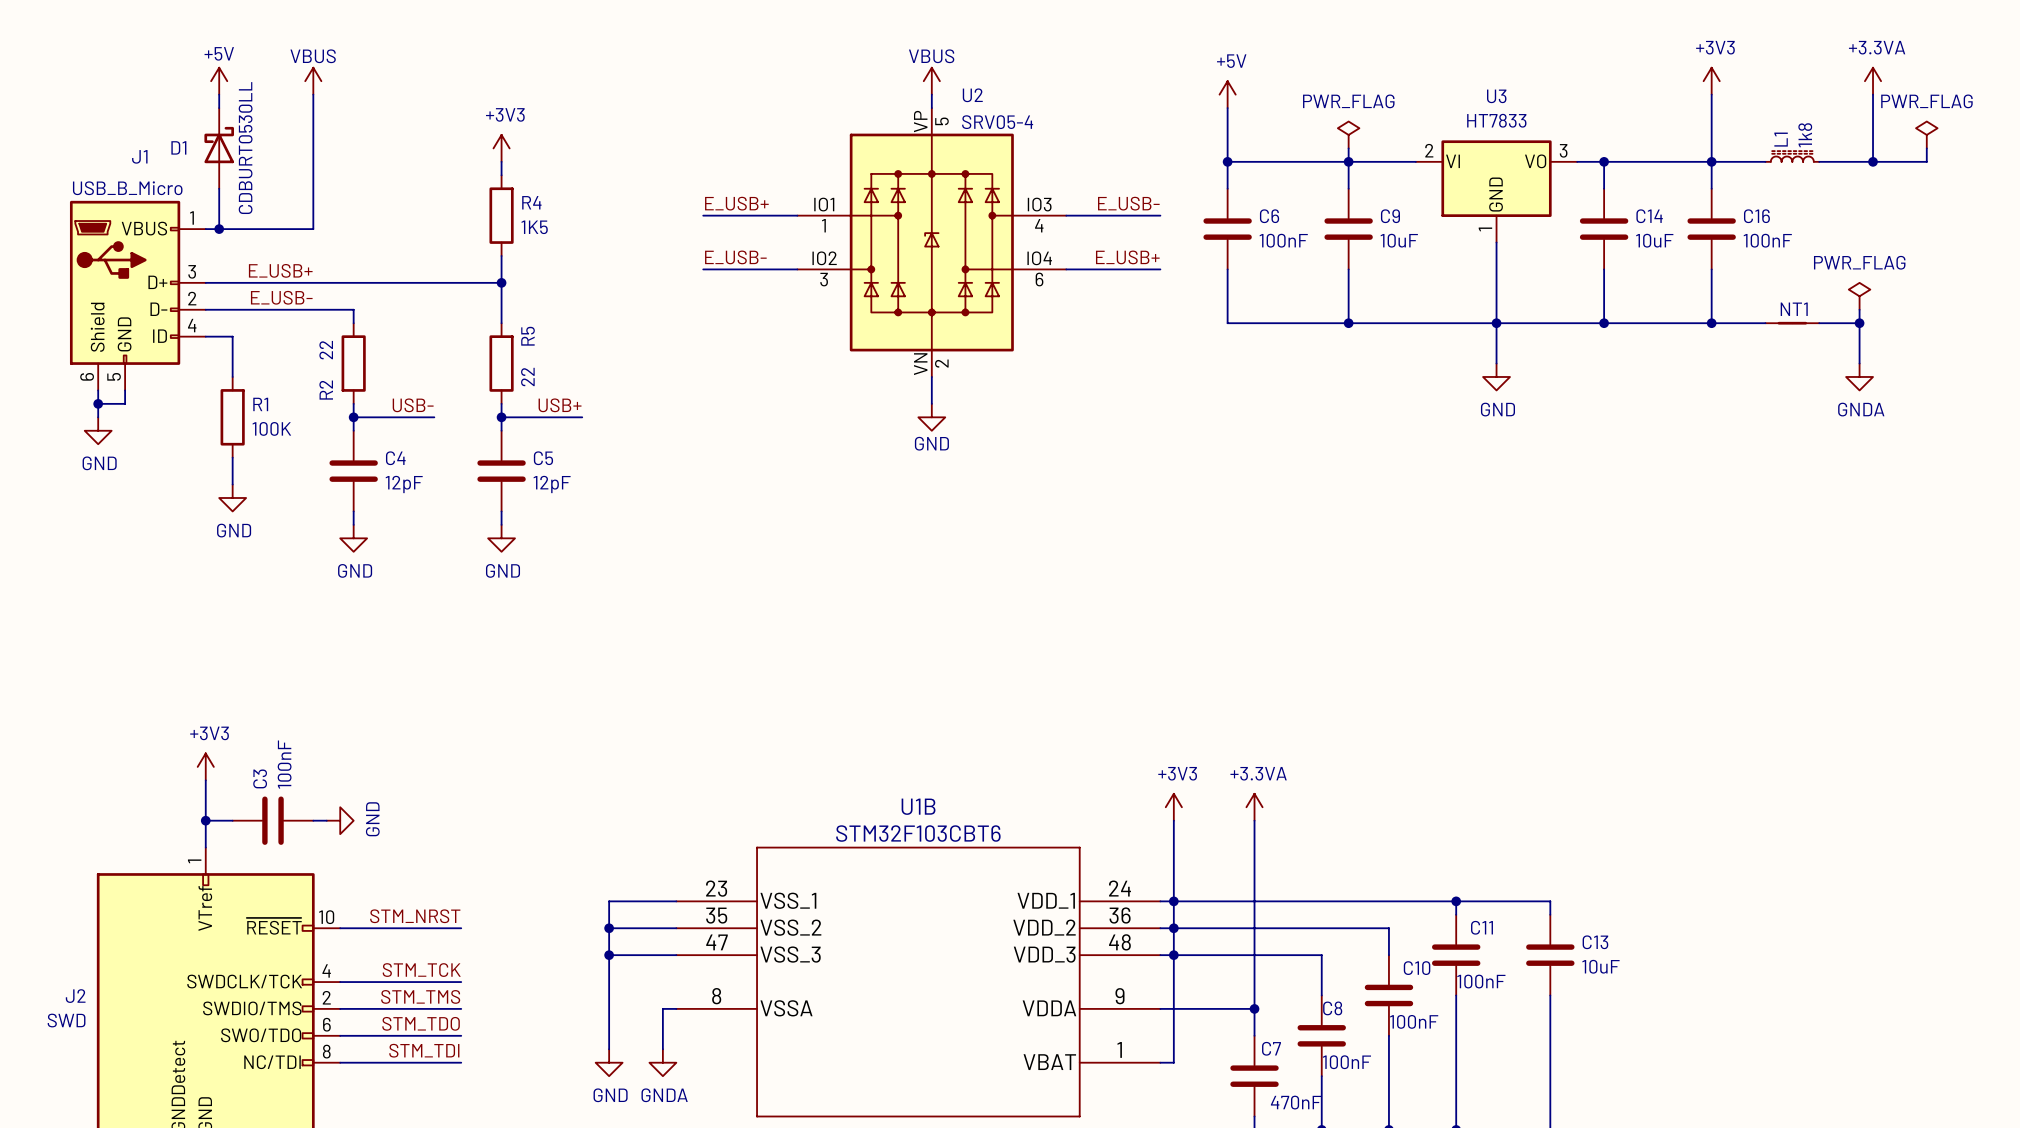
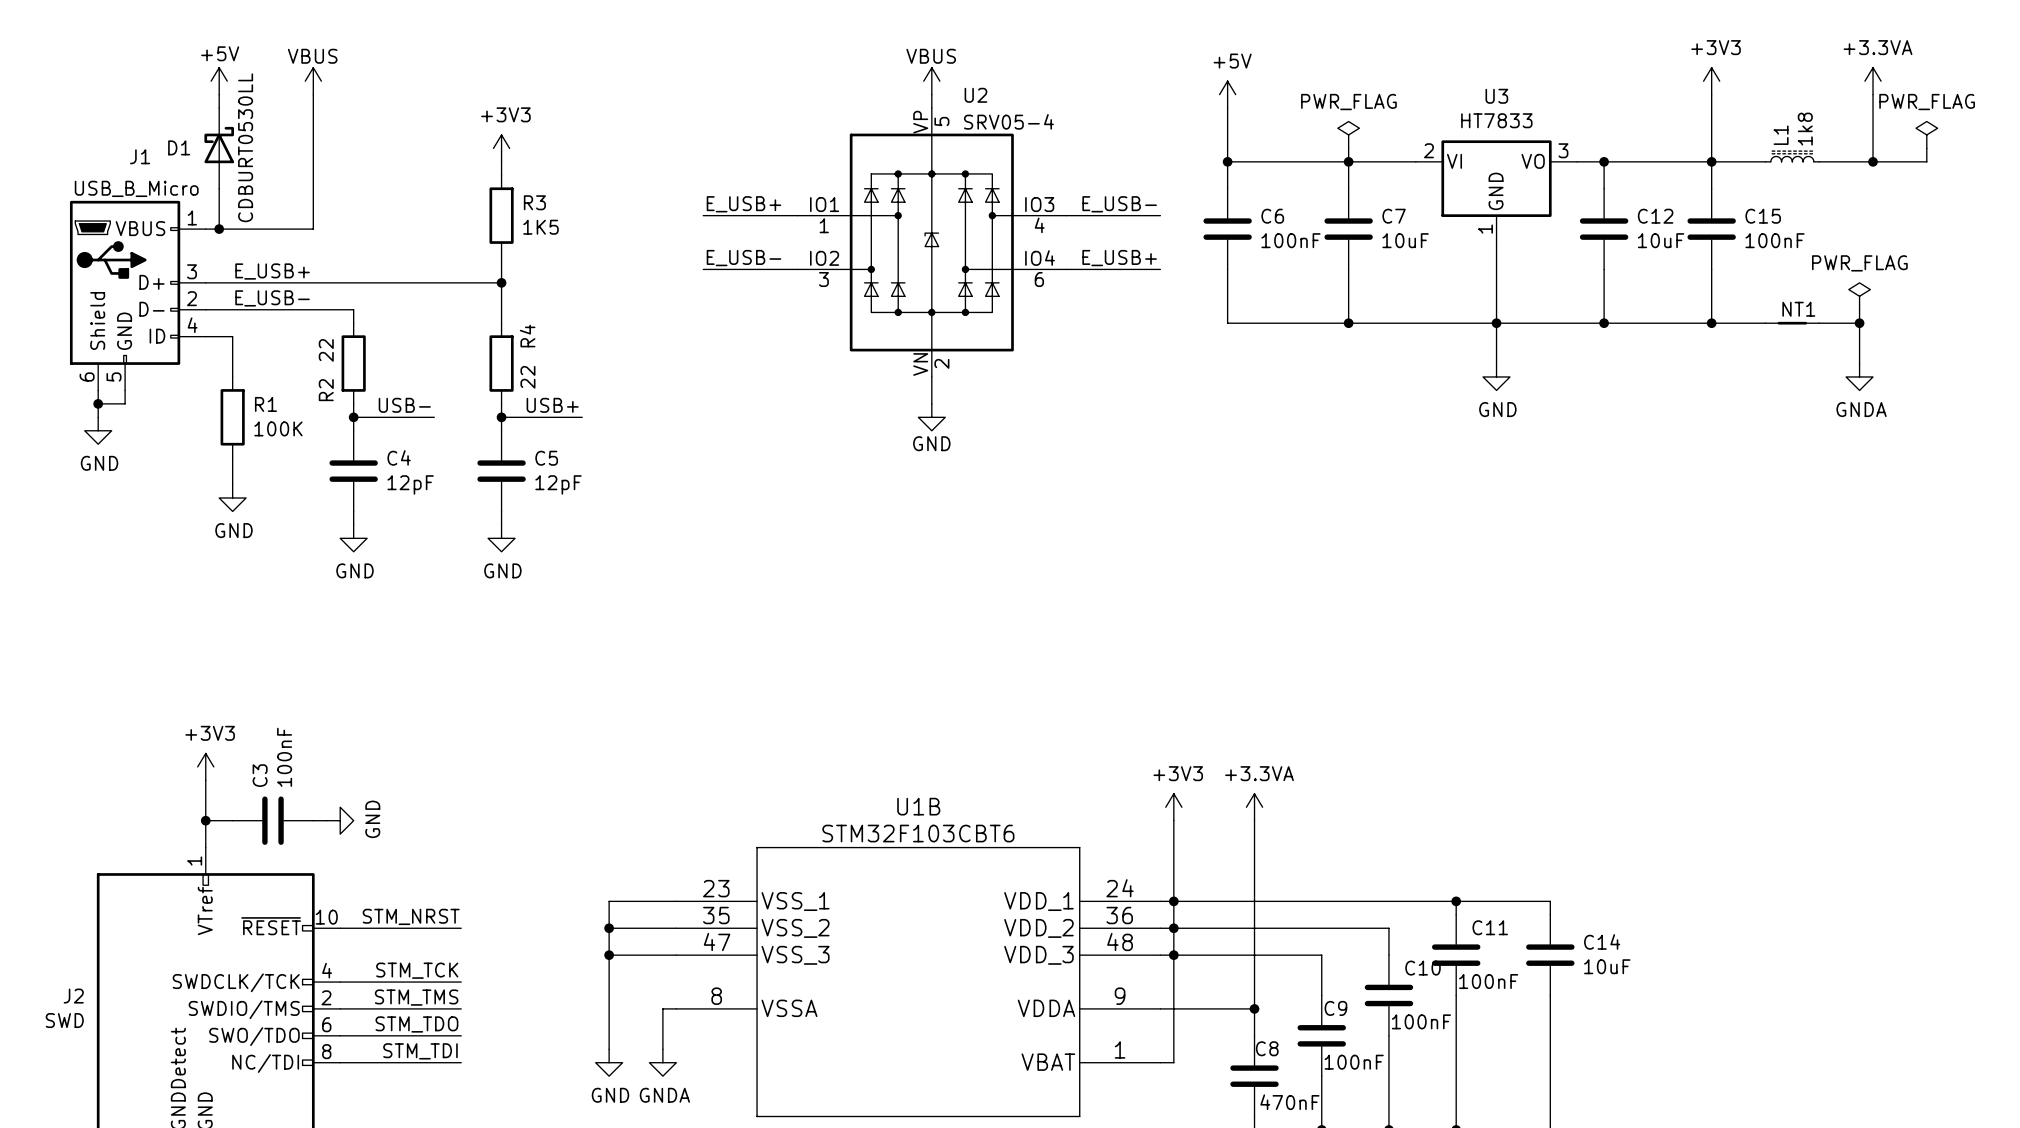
R4 name: R4 (531, 202) -> R3 (534, 202)
C9 name: C9 (1390, 216) -> C7 (1394, 216)
C14 name: C14 (1649, 216) -> C12 (1655, 216)
C16 name: C16 (1756, 216) -> C15 (1763, 216)
R5 name: R5 (528, 336) -> R4 (527, 336)
C13 name: C13 (1595, 942) -> C14 (1602, 941)
C8 name: C8 (1332, 1008) -> C9 (1335, 1008)
C7 name: C7 (1271, 1048) -> C8 (1267, 1048)

